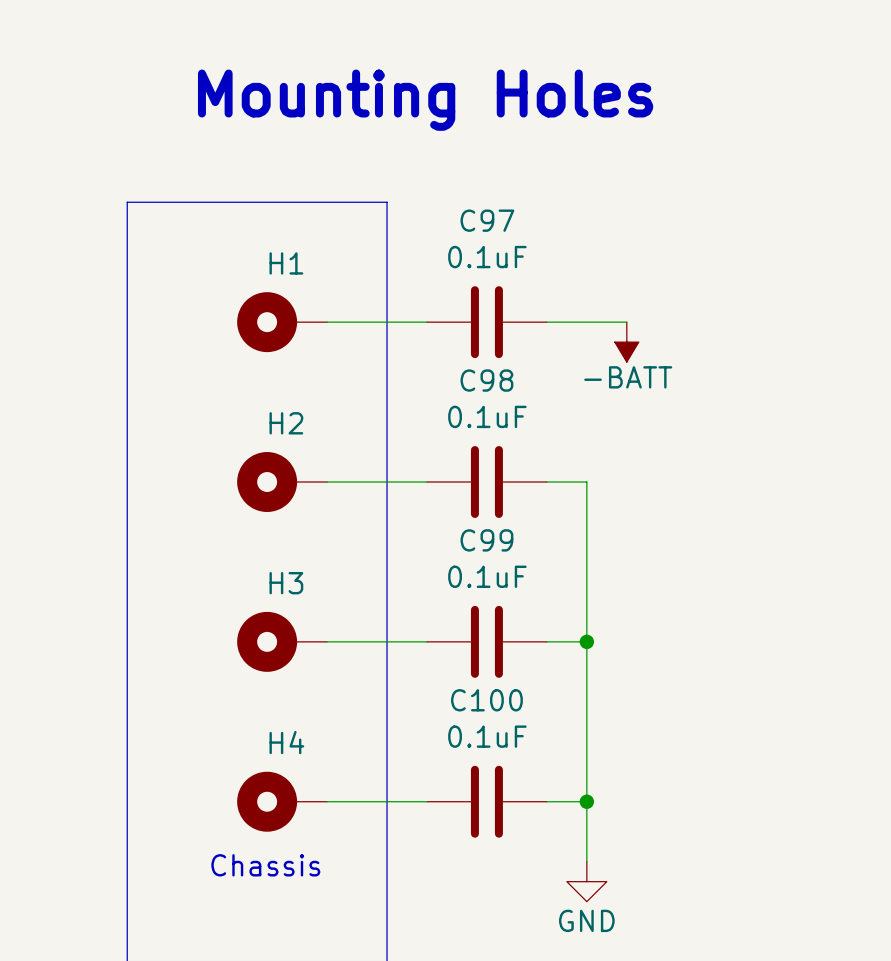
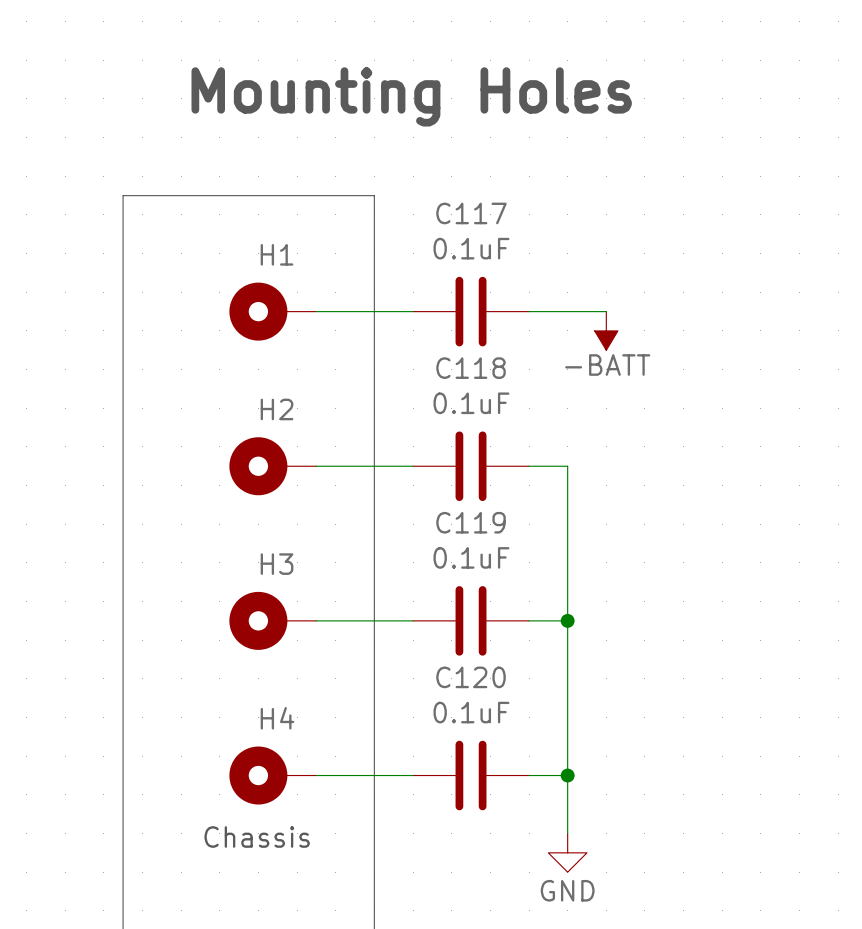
C97 name: C97 (487, 220) -> C117 (471, 213)
C98 name: C98 (486, 380) -> C118 (471, 368)
C99 name: C99 (486, 540) -> C119 (471, 522)
C100 name: C100 (486, 700) -> C120 (471, 677)

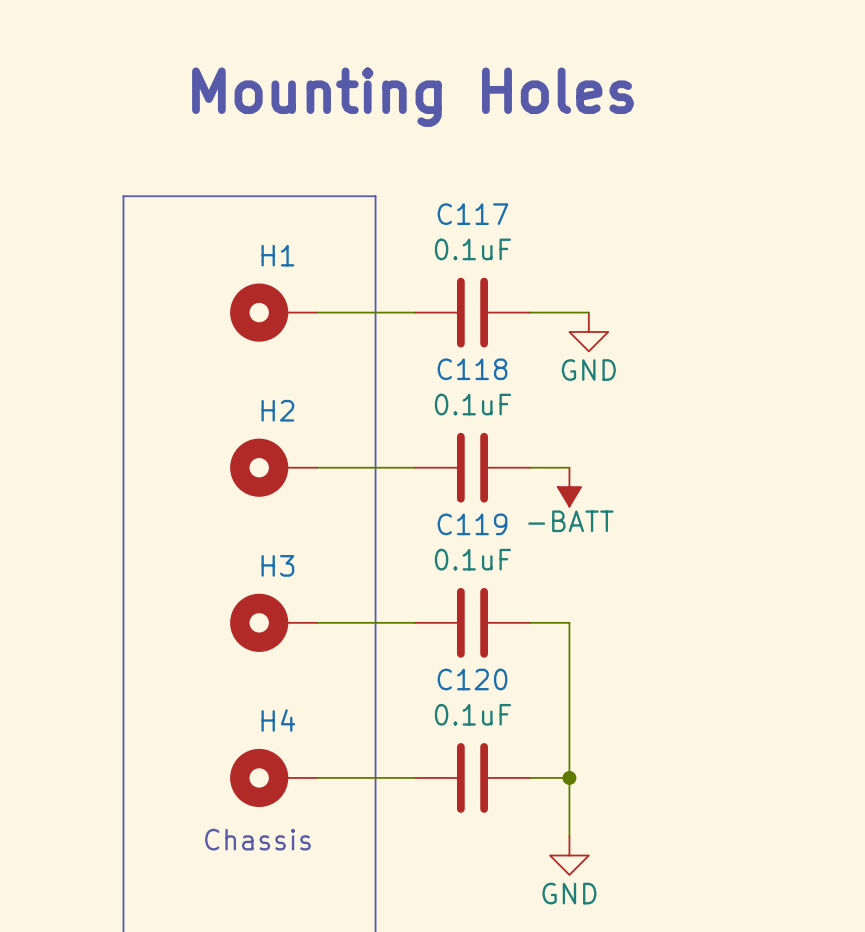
wire: (586, 311) (606, 311) -> none
power symbol: none -> GND (588, 331)
power symbol position: -BATT (606, 330) -> -BATT (569, 487)
wire: (567, 466) (567, 620) -> none
junction: (567, 620) -> none

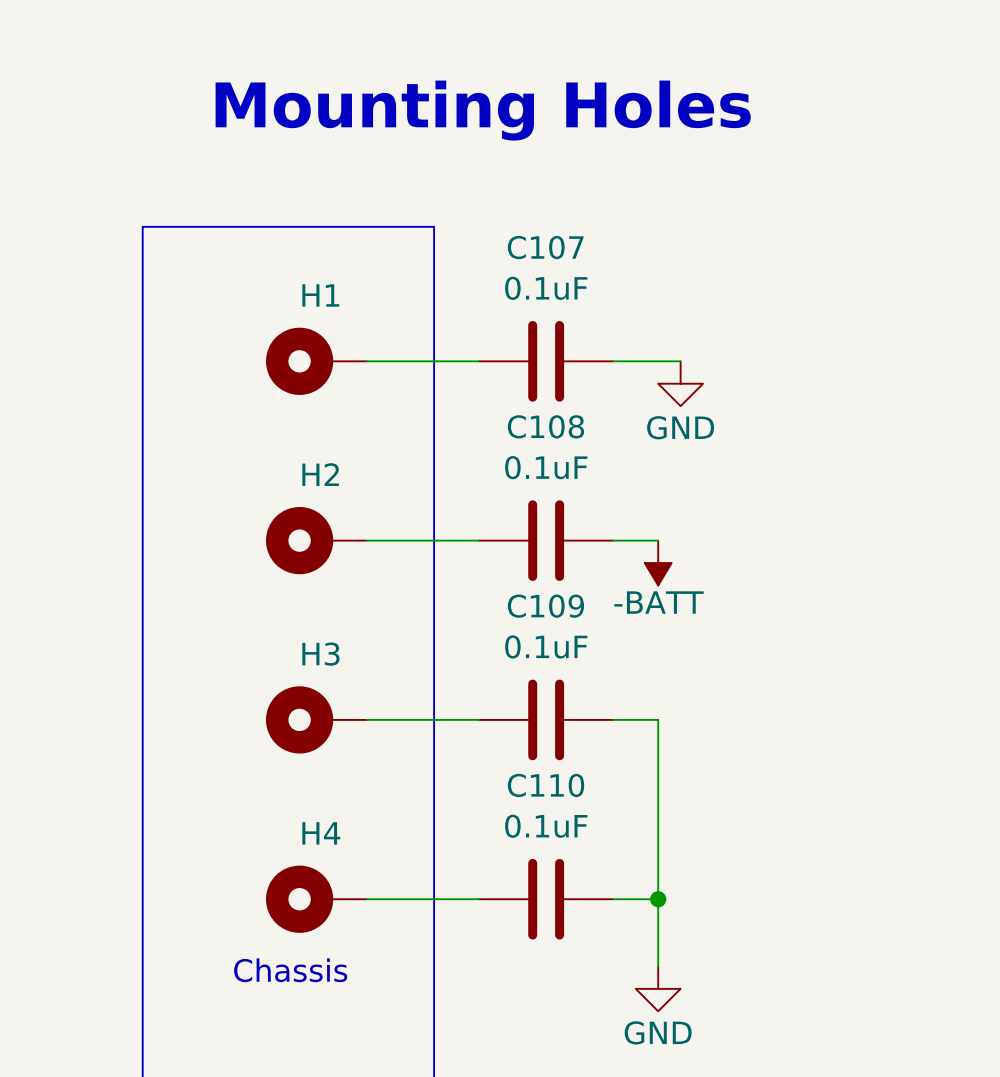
C117 name: C117 (472, 214) -> C107 (545, 247)
C118 name: C118 (472, 369) -> C108 (545, 426)
C119 name: C119 (472, 524) -> C109 (545, 606)
C120 name: C120 (472, 679) -> C110 (545, 785)

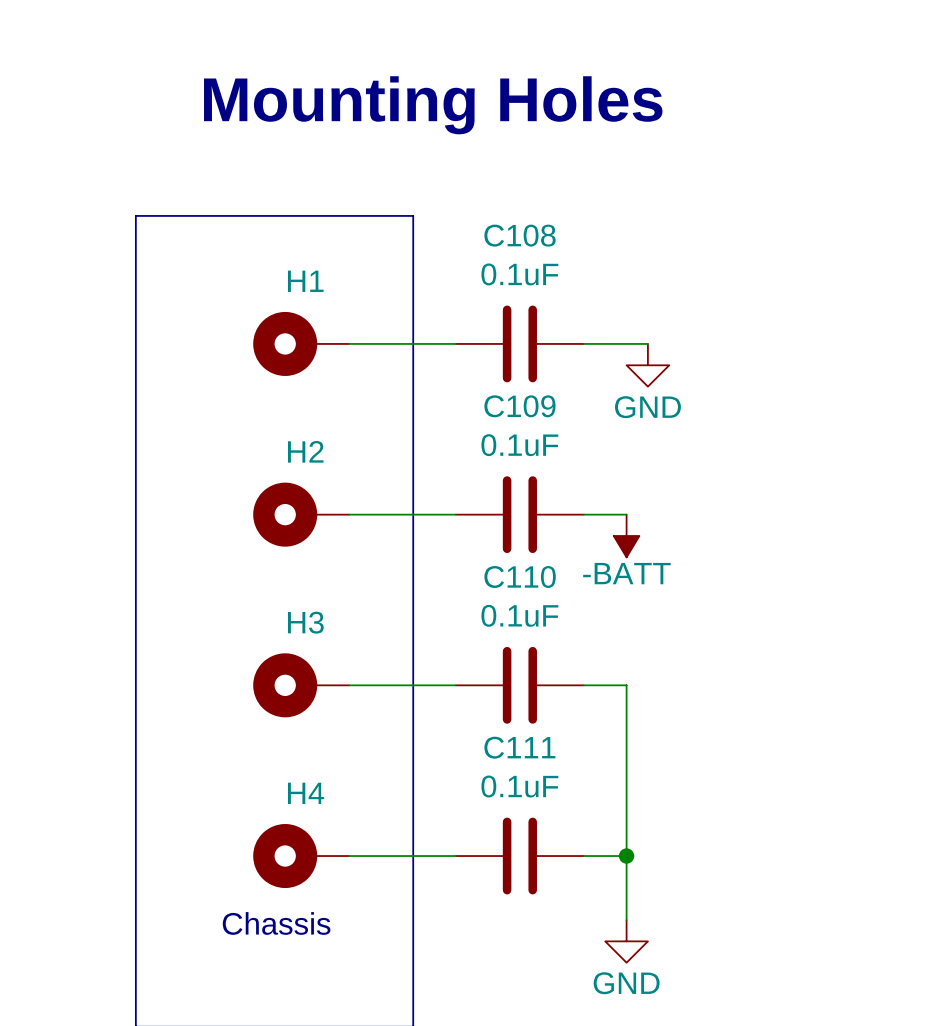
C107 name: C107 (545, 247) -> C108 (520, 235)
C108 name: C108 (545, 426) -> C109 (519, 406)
C109 name: C109 (545, 606) -> C110 (520, 576)
C110 name: C110 (545, 785) -> C111 (519, 747)

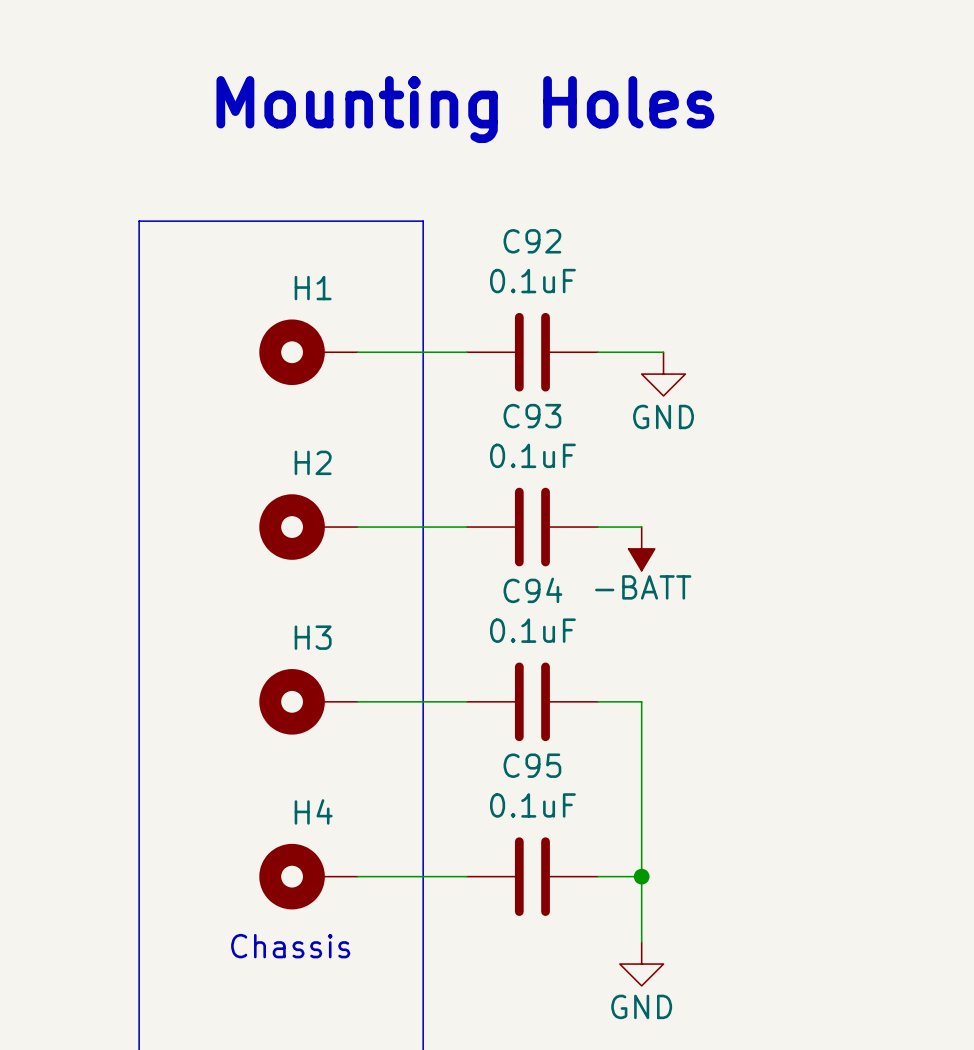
C108 name: C108 (520, 235) -> C92 (532, 241)
C109 name: C109 (519, 406) -> C93 (532, 416)
C110 name: C110 (520, 576) -> C94 (532, 590)
C111 name: C111 (519, 747) -> C95 (532, 765)

